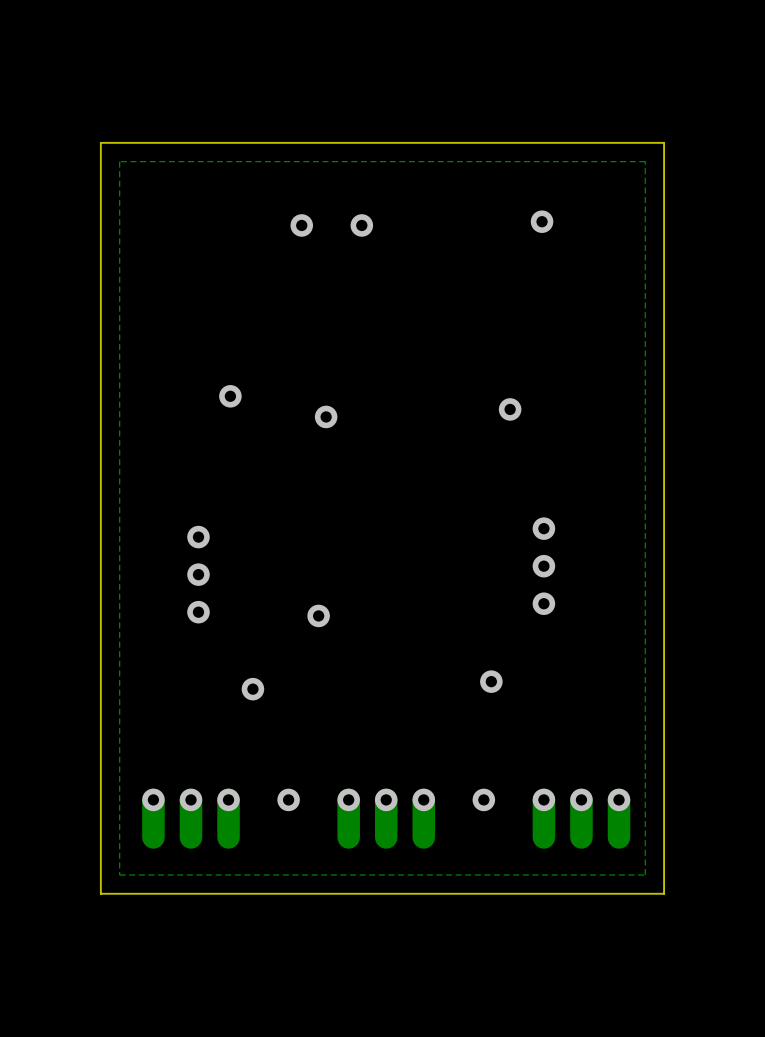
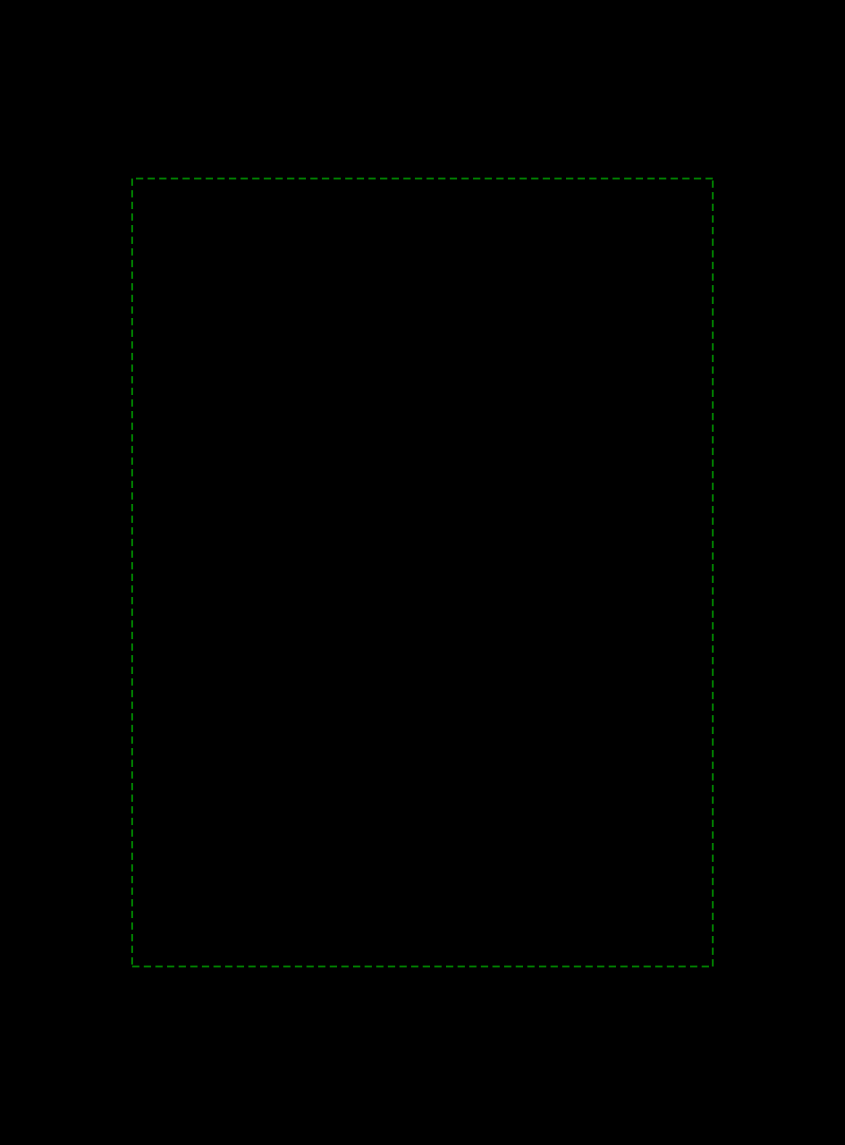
board edge: (664, 142) (100, 142) (100, 893) (664, 893) (664, 142) -> none
via: (542, 221) -> none
via: (301, 225) -> none
via: (361, 225) -> none
via: (230, 396) -> none
via: (510, 409) -> none
via: (326, 416) -> none
via: (543, 528) -> none
via: (198, 537) -> none
via: (543, 566) -> none
via: (198, 574) -> none
via: (543, 603) -> none
via: (198, 612) -> none
via: (318, 615) -> none
via: (491, 681) -> none
via: (252, 689) -> none
track: (153, 799) (153, 837) -> none
via: (153, 799) -> none
track: (190, 799) (190, 837) -> none
via: (190, 799) -> none
track: (228, 799) (228, 837) -> none
via: (228, 799) -> none
via: (288, 799) -> none
track: (348, 799) (348, 837) -> none
via: (348, 799) -> none
track: (386, 799) (386, 837) -> none
via: (386, 799) -> none
track: (423, 799) (423, 837) -> none
via: (423, 799) -> none
via: (483, 799) -> none
track: (543, 799) (543, 837) -> none
via: (543, 799) -> none
track: (581, 799) (581, 837) -> none
via: (581, 799) -> none
track: (619, 799) (619, 837) -> none
via: (619, 799) -> none

